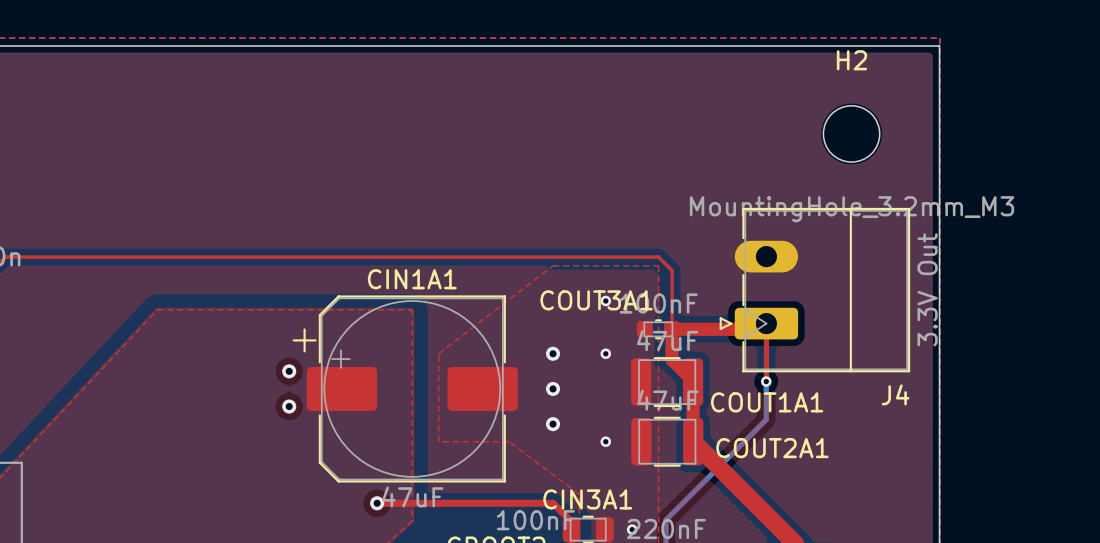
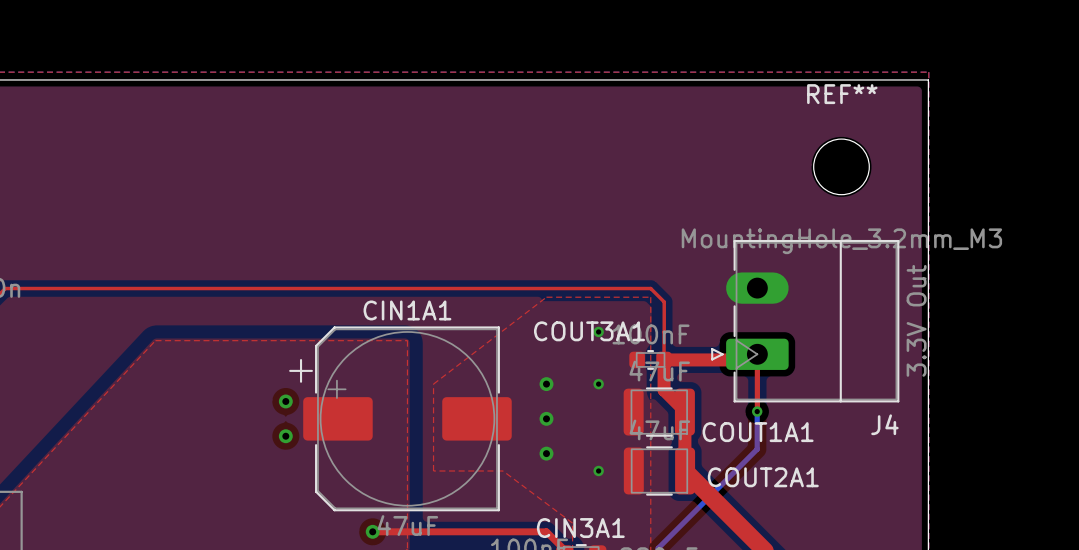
H2 name: H2 (851, 60) -> REF** (842, 94)

